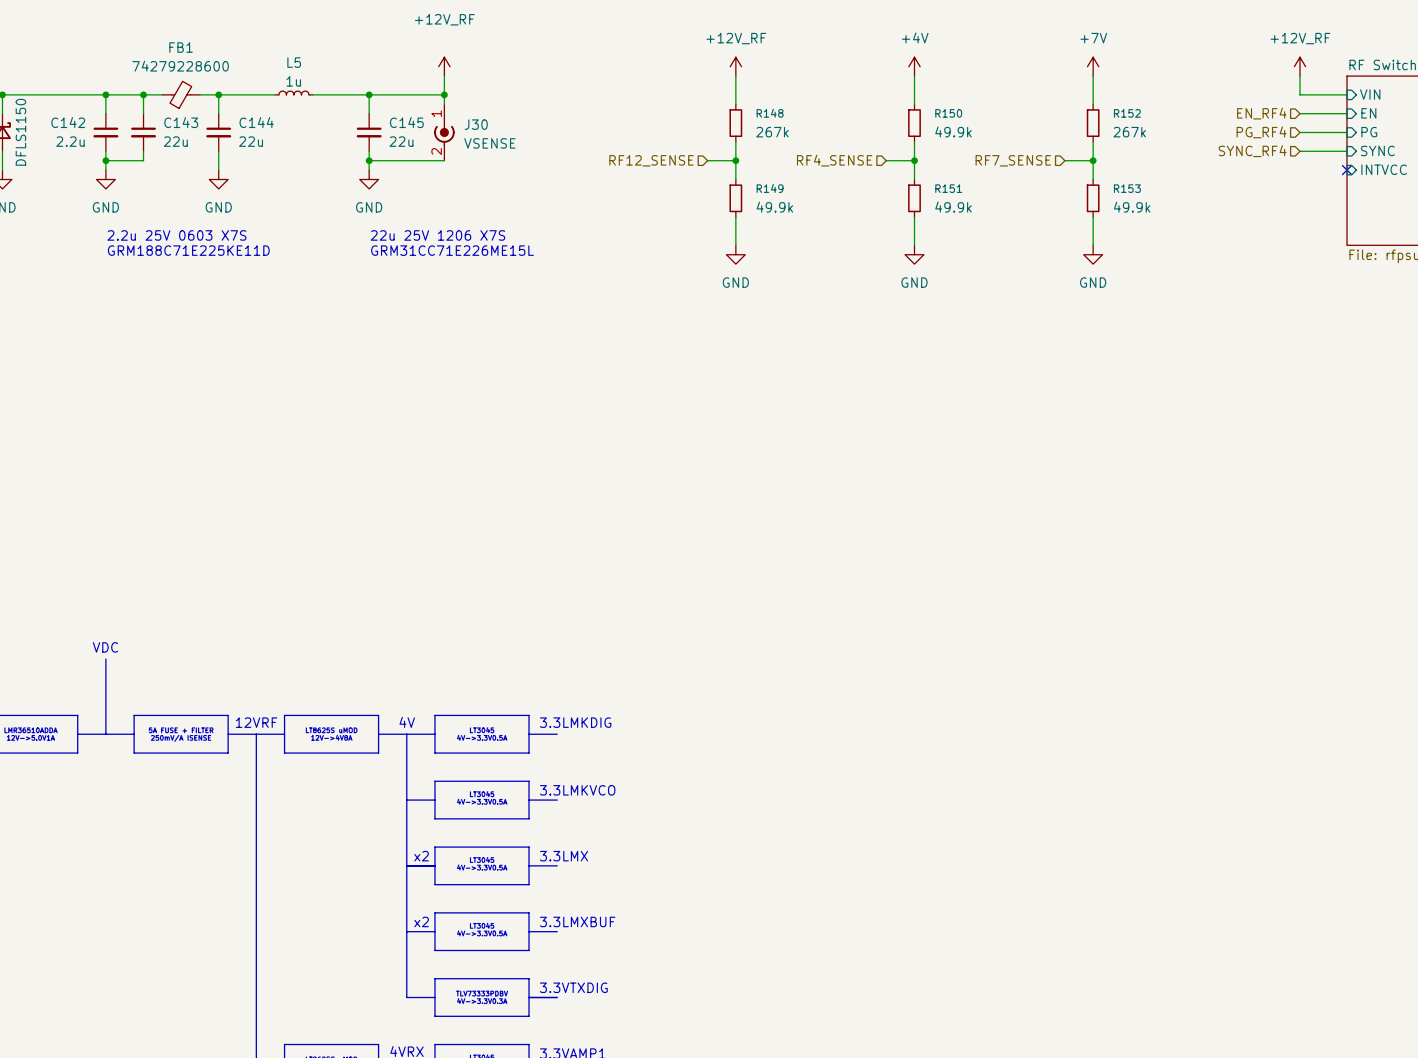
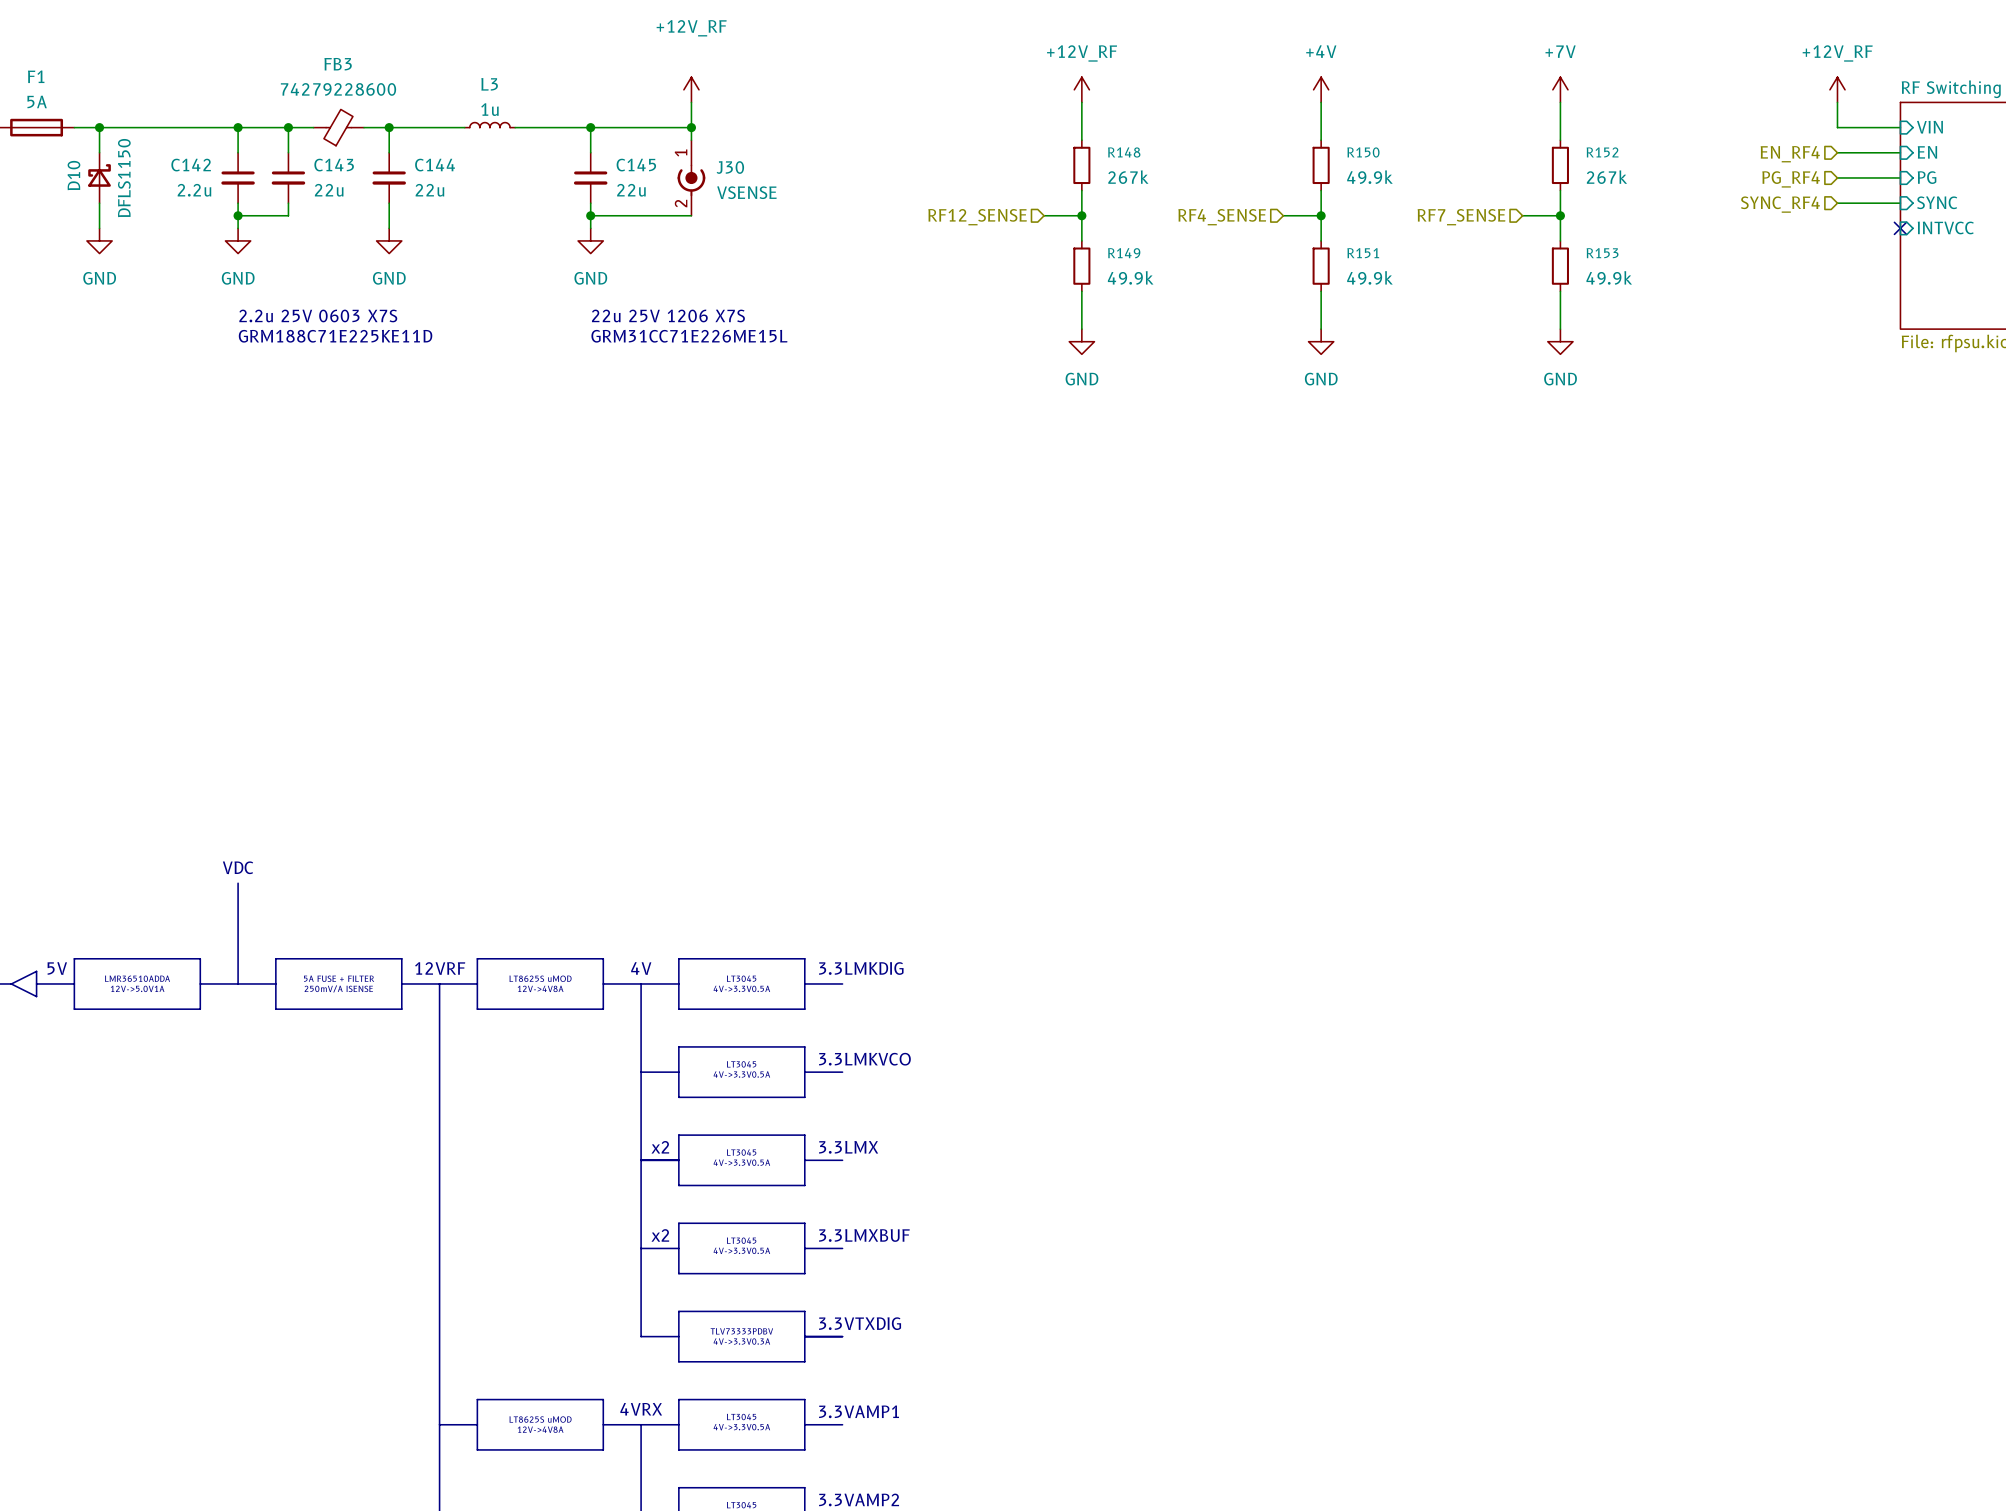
FB1 name: FB1 (181, 47) -> FB3 (338, 64)
L5 name: L5 (294, 62) -> L3 (489, 84)

